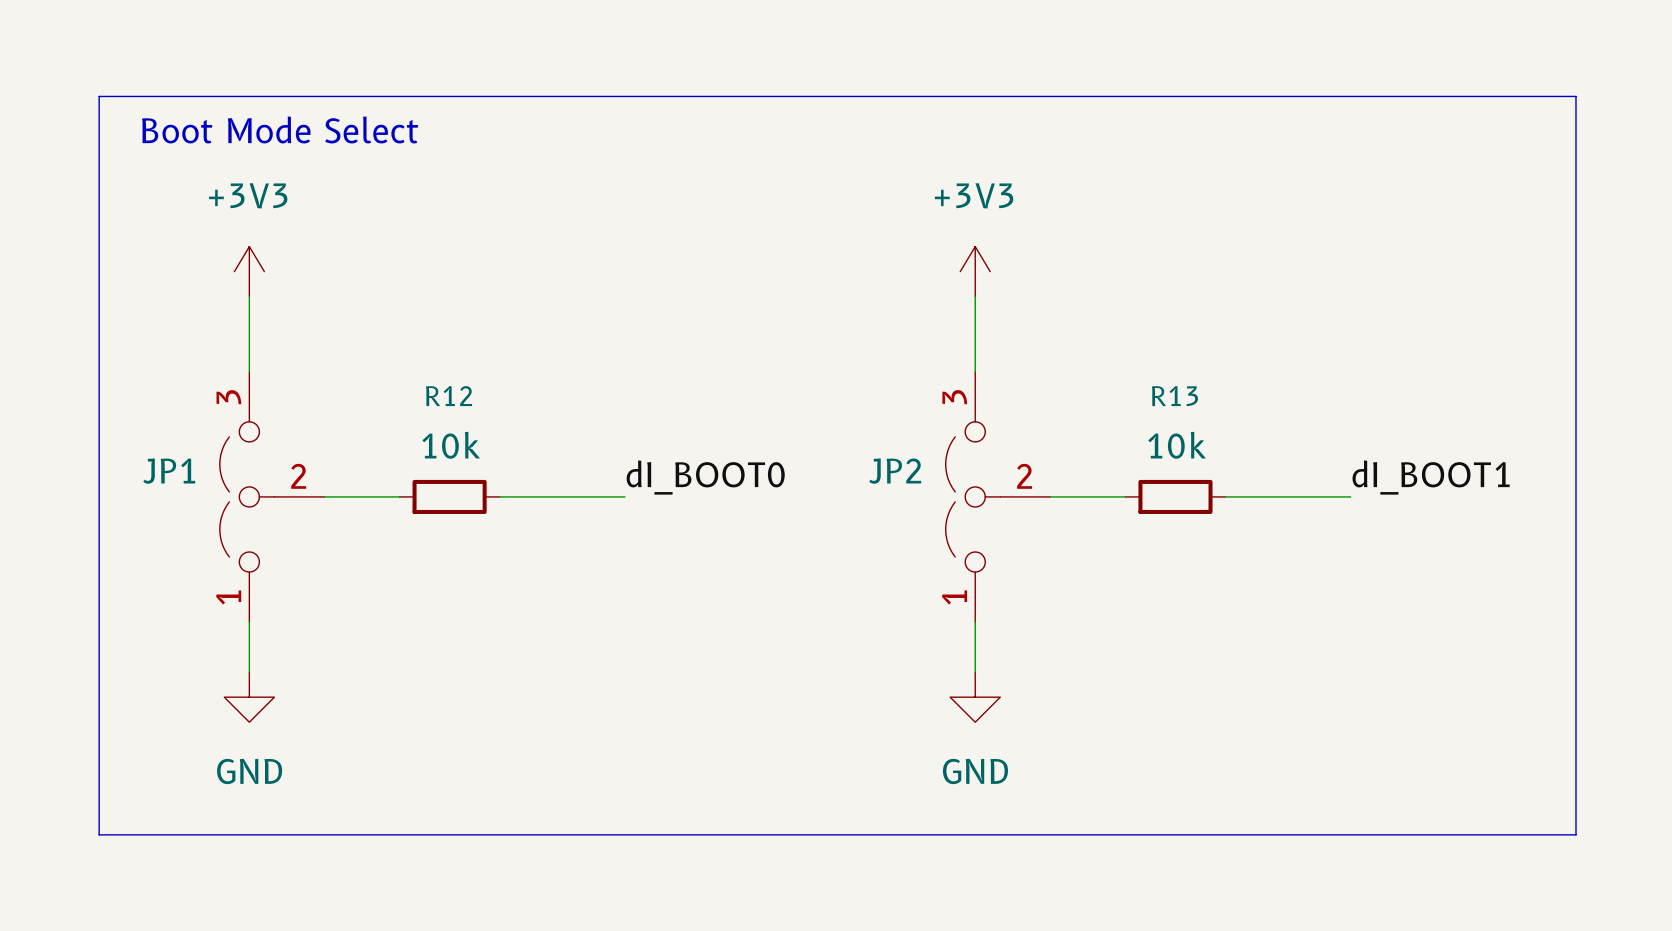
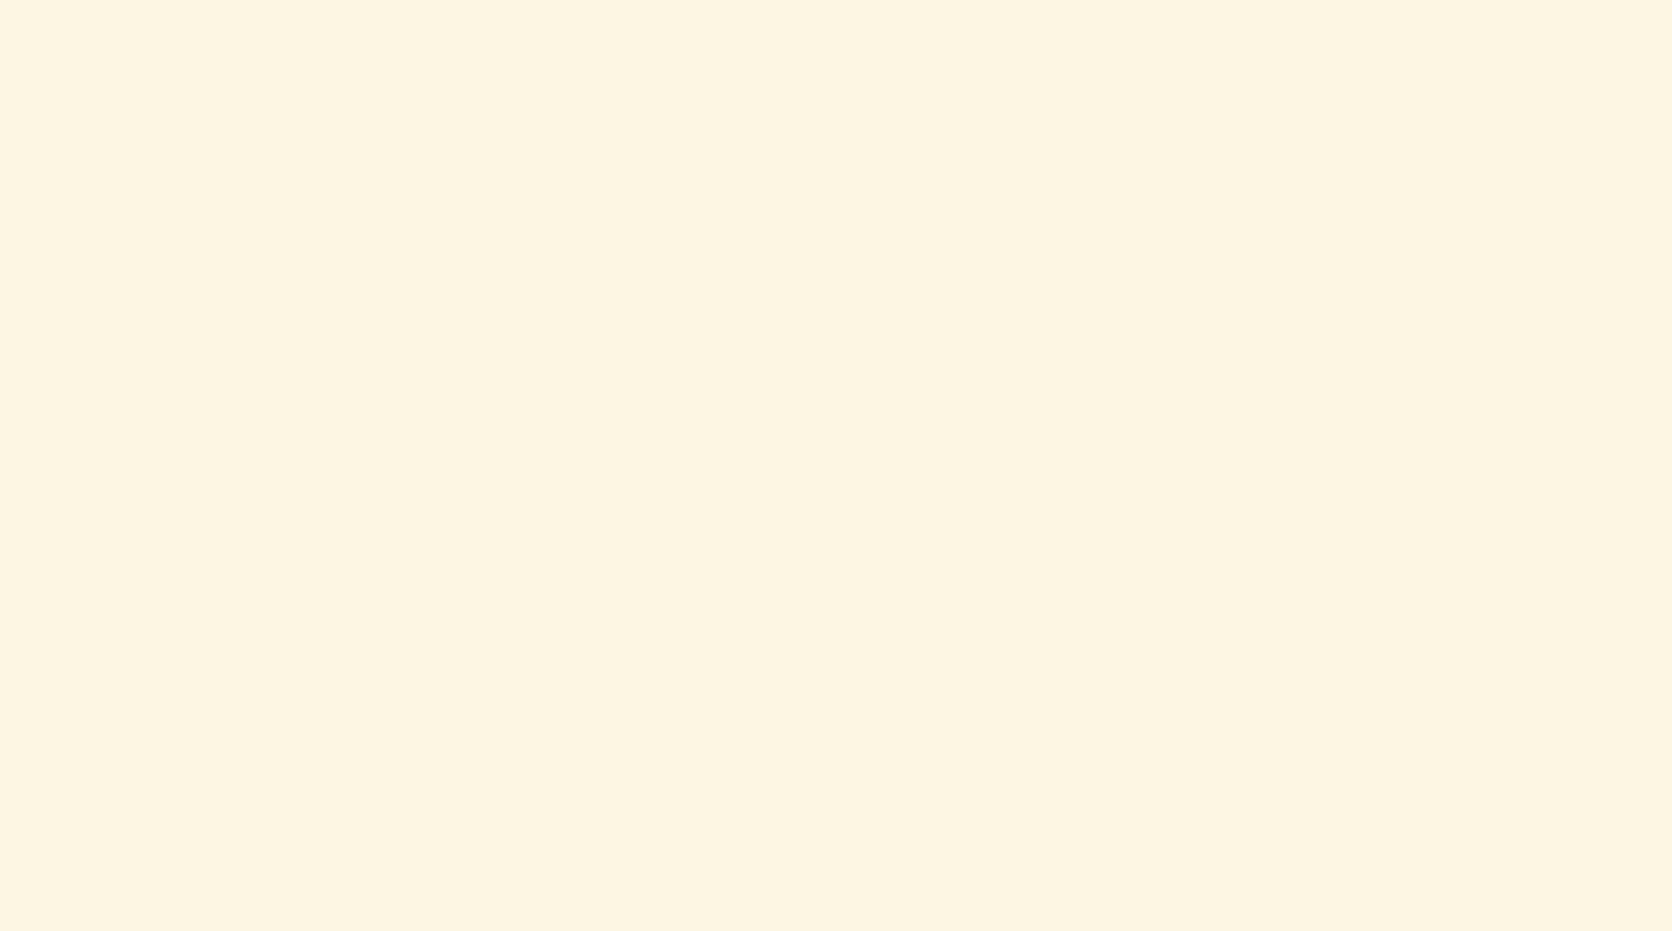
line: (99, 96) (1575, 96) (1575, 834) (99, 834) (99, 96) -> none
text: Boot Mode Select (280, 129) -> none
power symbol: +3V3 (249, 271) -> none
power symbol: +3V3 (975, 271) -> none
wire: (249, 296) (249, 371) -> none
wire: (975, 296) (975, 371) -> none
label: dI_BOOT0 (705, 477) -> none
label: dI_BOOT1 (1431, 477) -> none
JP1: (272, 496) -> none
wire: (324, 496) (399, 496) -> none
R12: 10k (449, 496) -> none
wire: (499, 496) (624, 496) -> none
JP2: (998, 496) -> none
wire: (1050, 496) (1125, 496) -> none
R13: 10k (1175, 496) -> none
wire: (1225, 496) (1350, 496) -> none
wire: (249, 622) (249, 672) -> none
wire: (975, 622) (975, 672) -> none
power symbol: GND (249, 697) -> none
power symbol: GND (975, 697) -> none

